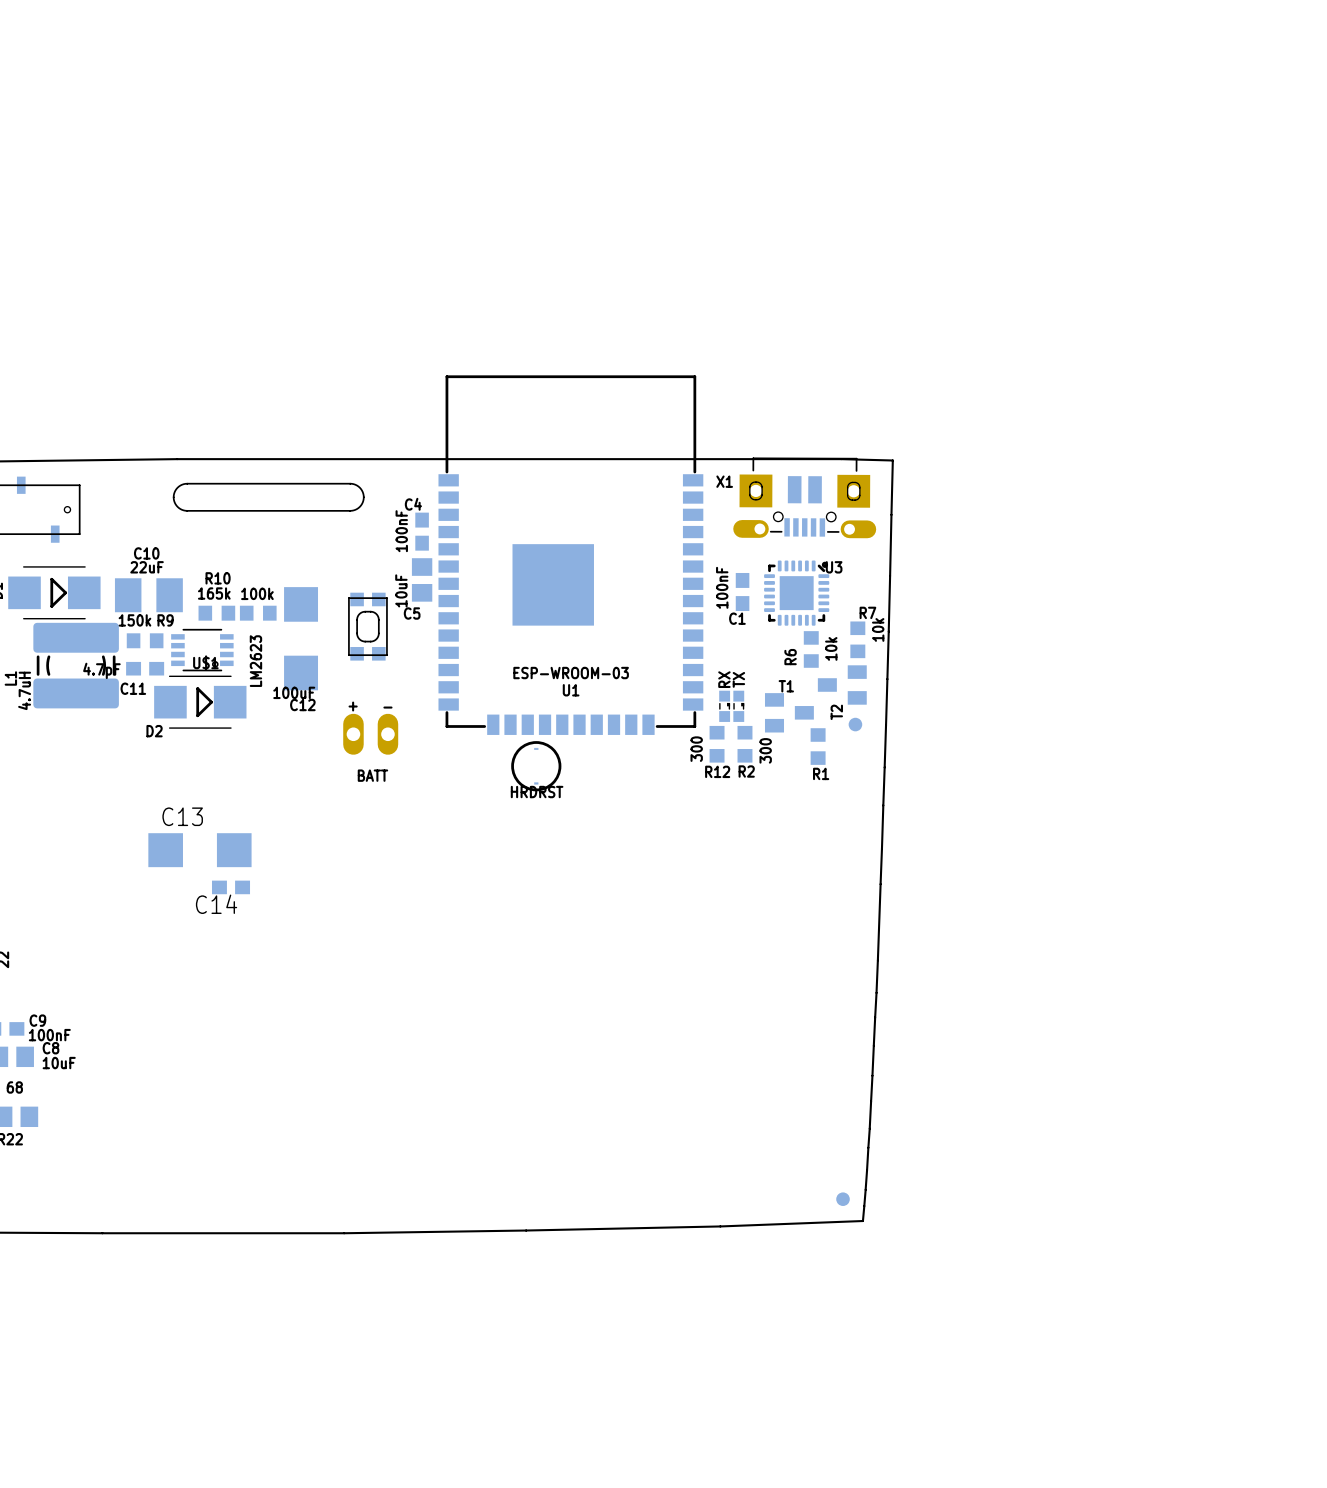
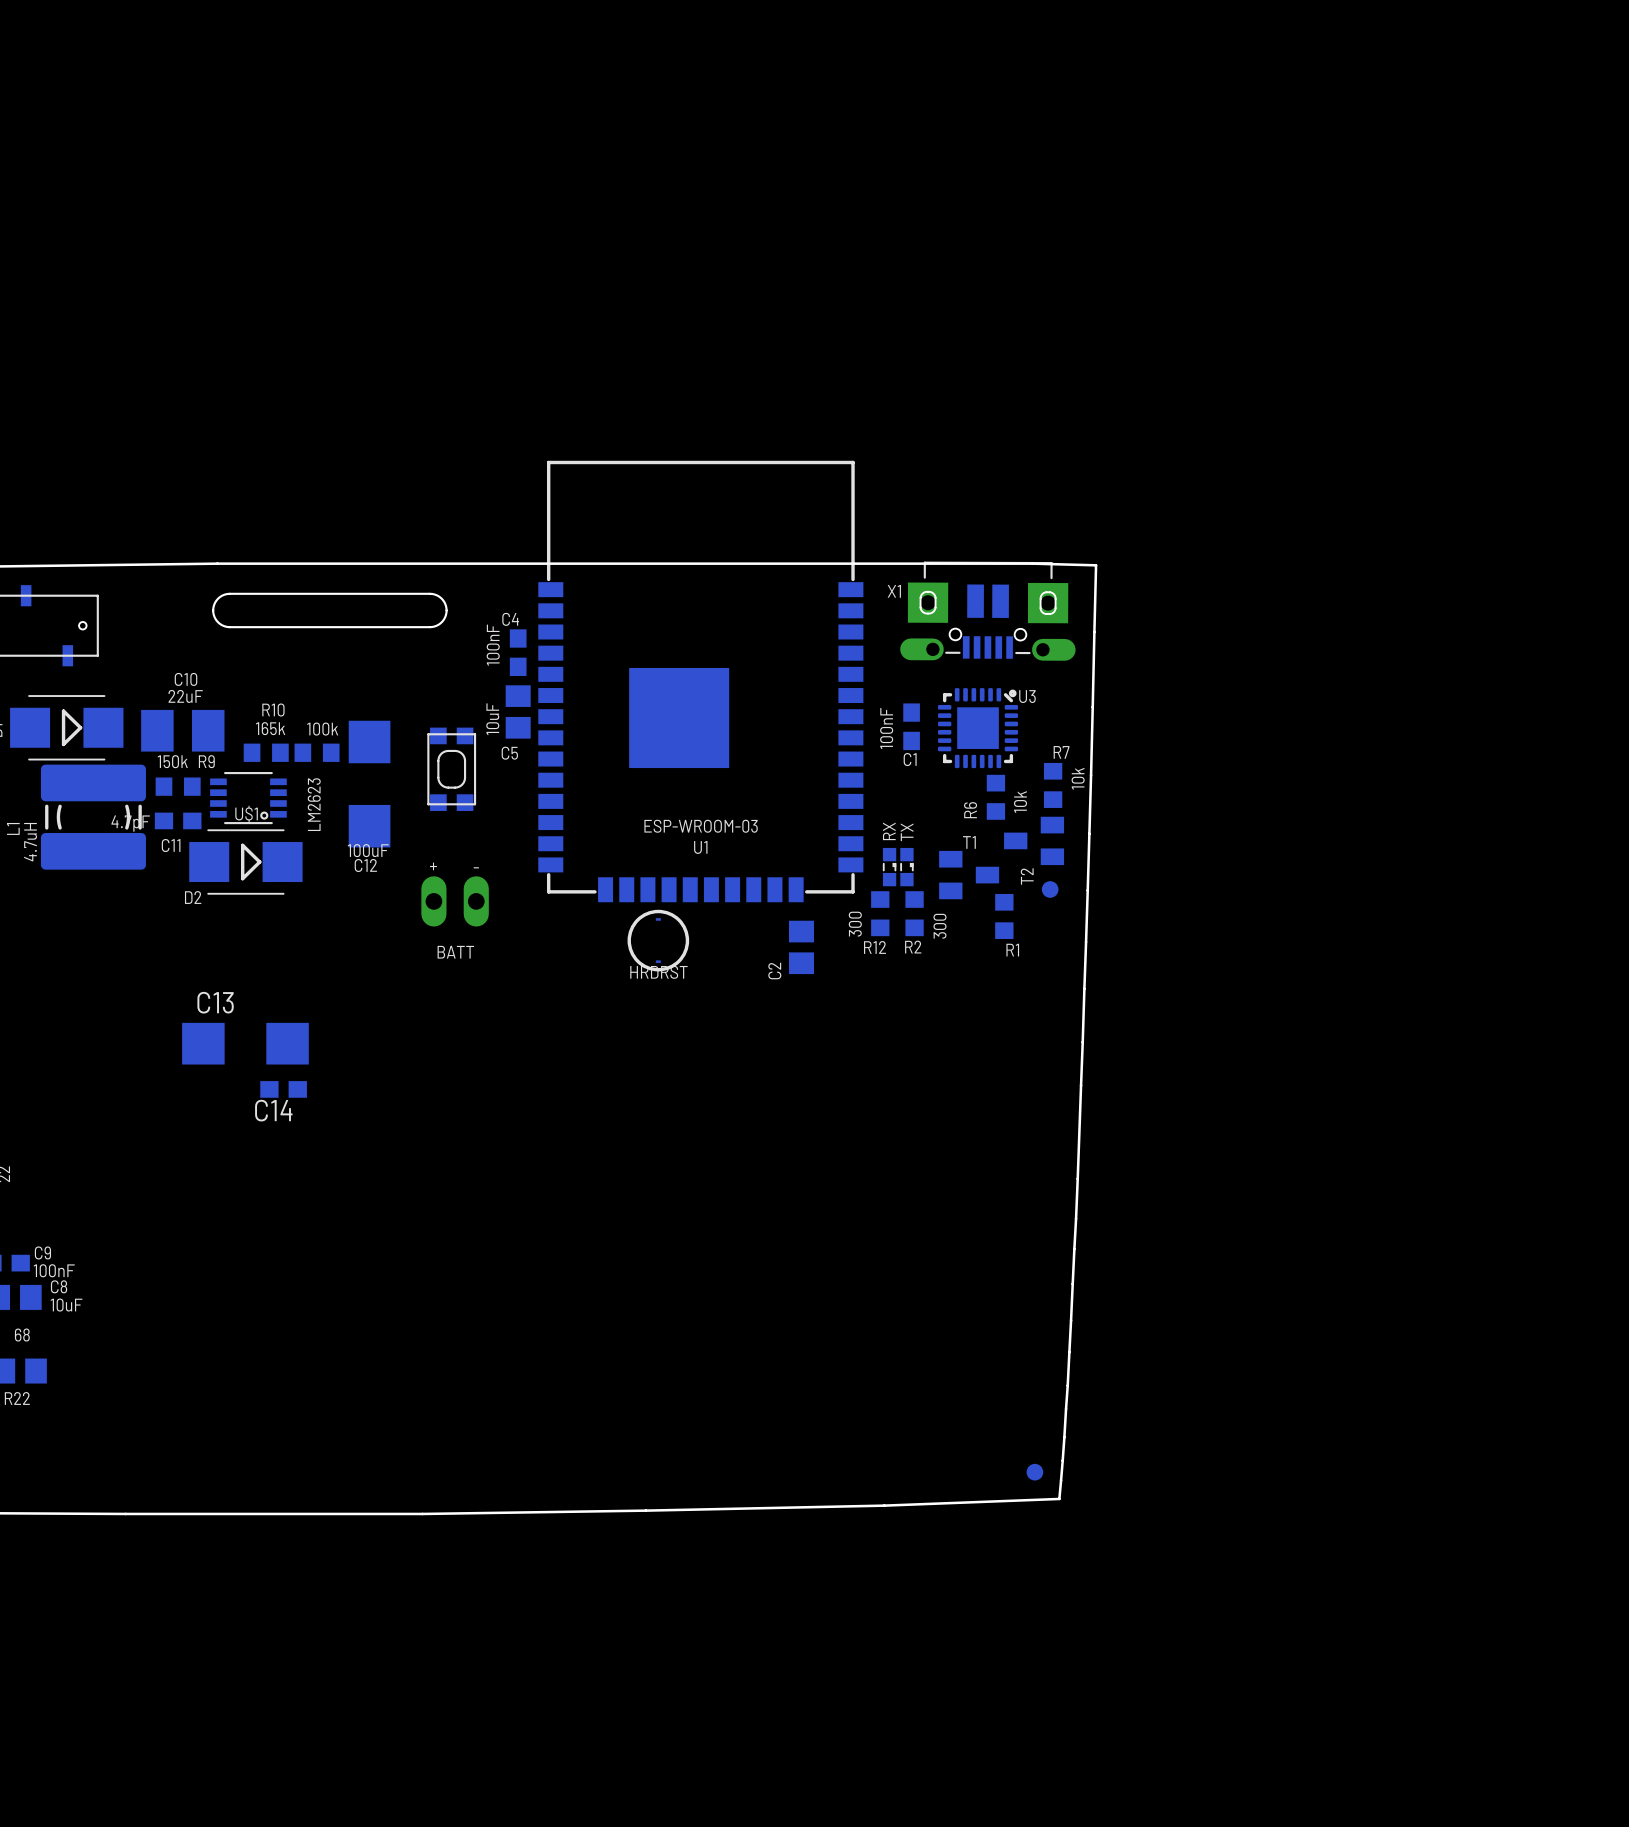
C2: none -> (801, 947)

